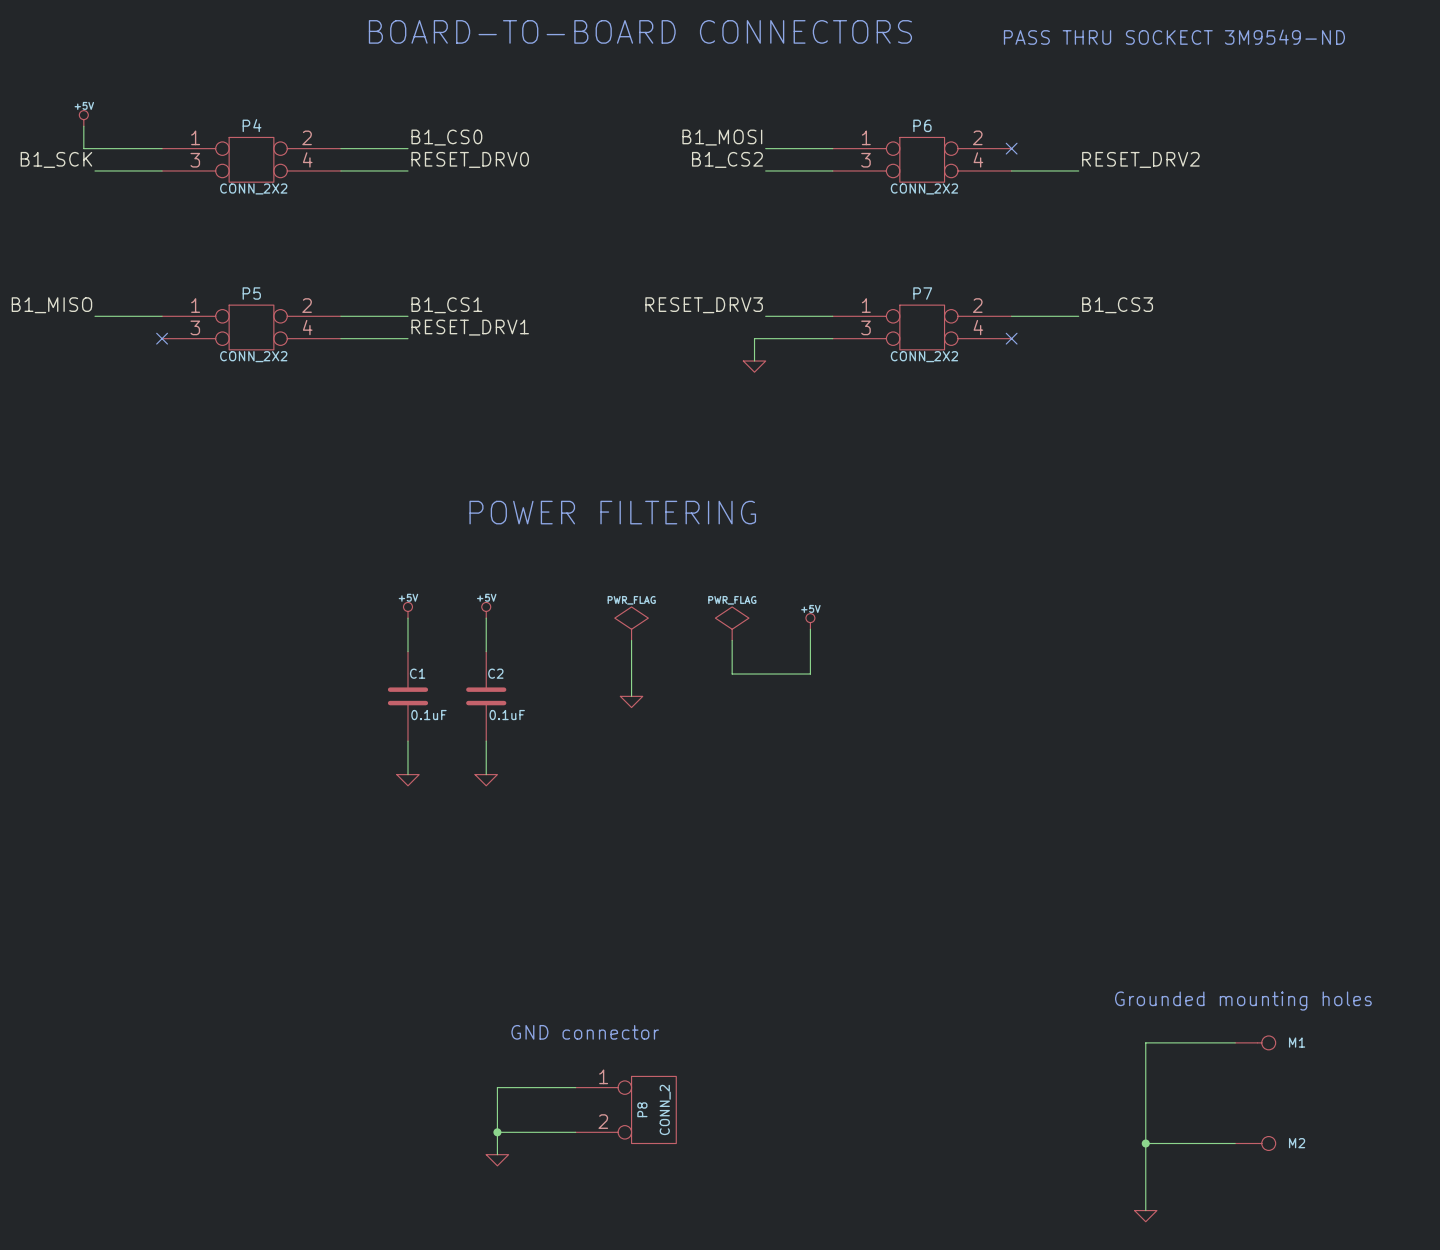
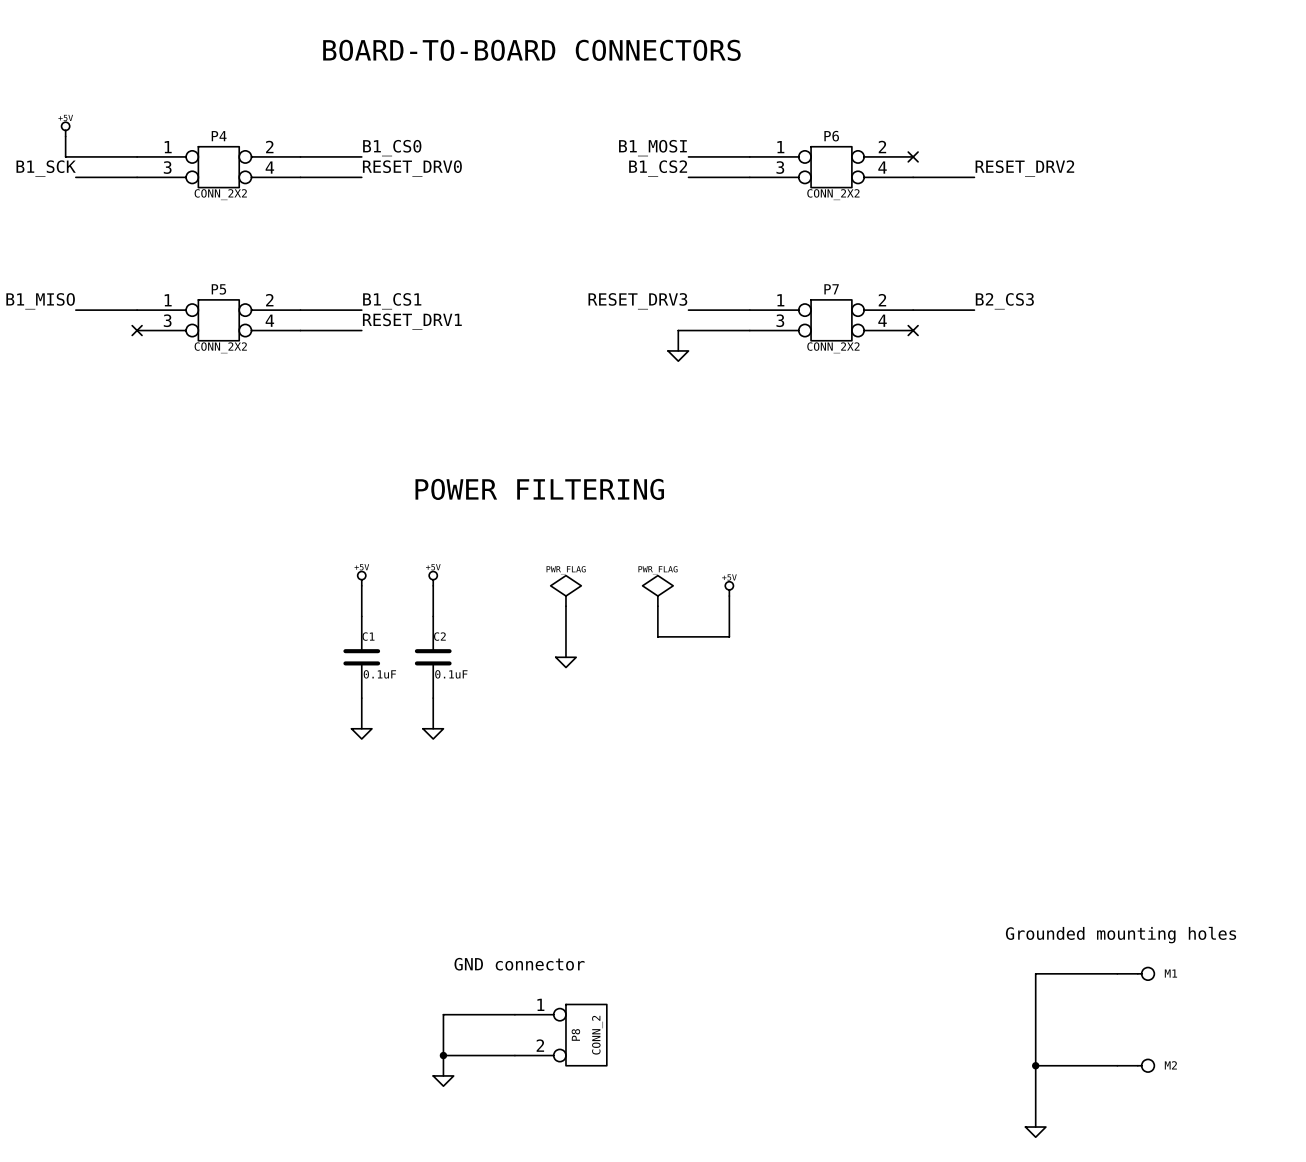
text: PASS THRU SOCKECT 3M9549-ND (1174, 37) -> none
label: B1_CS3 (1117, 305) -> B2_CS3 (1004, 301)

